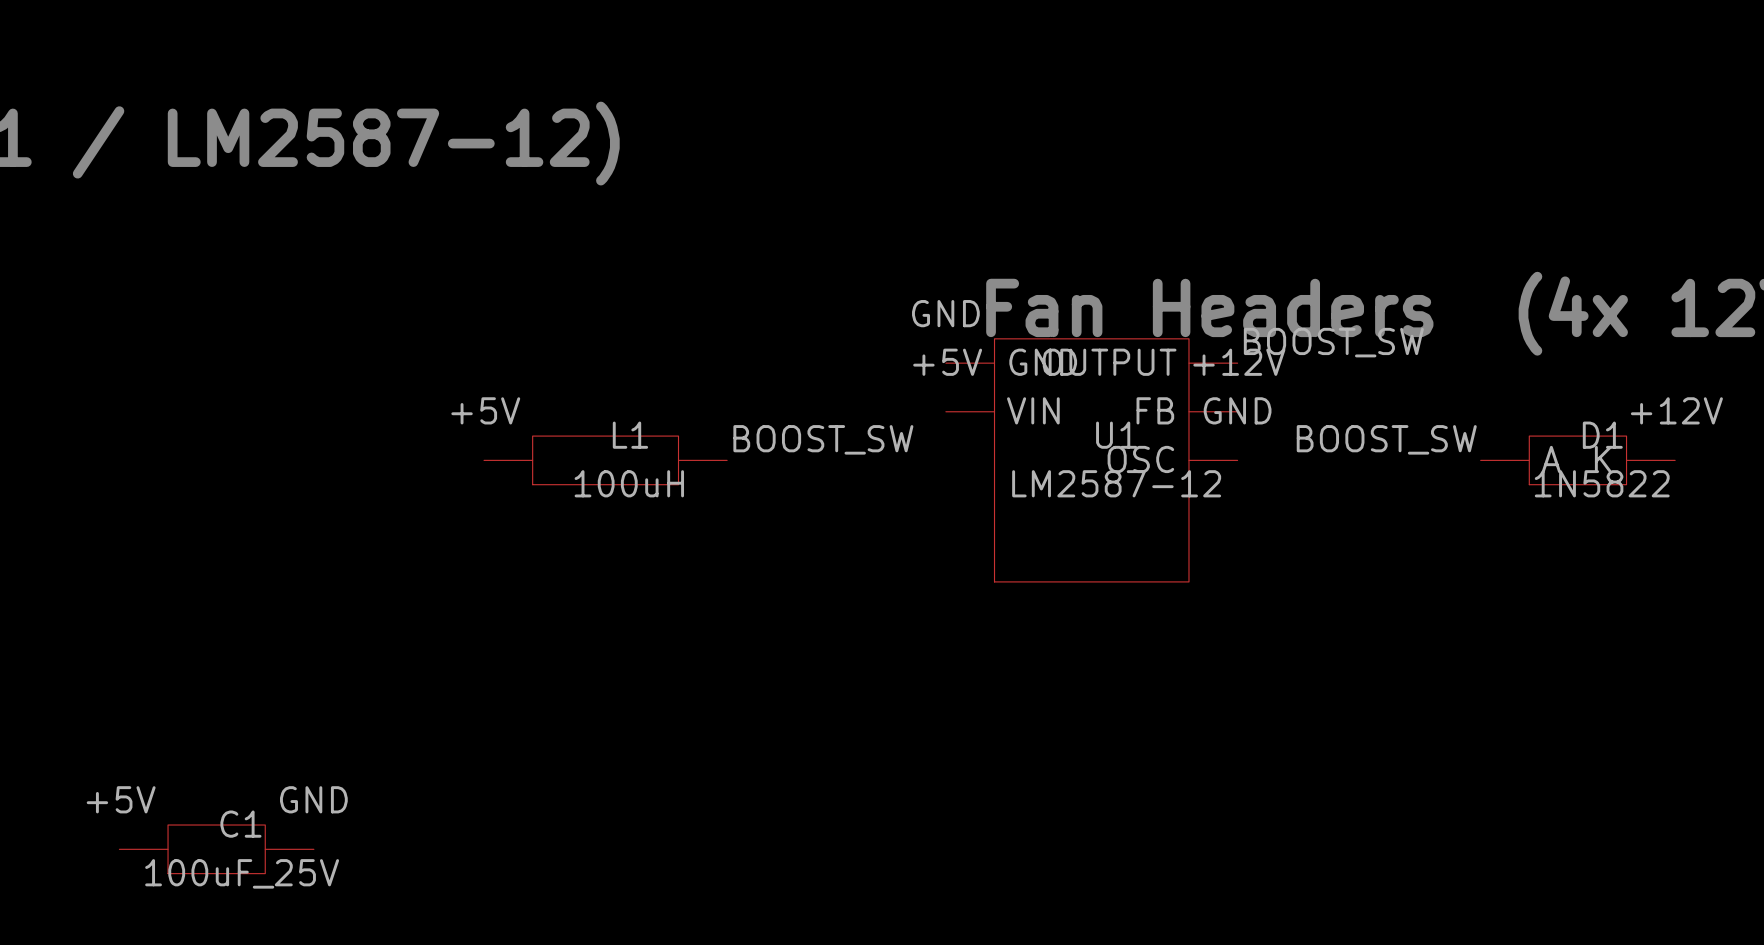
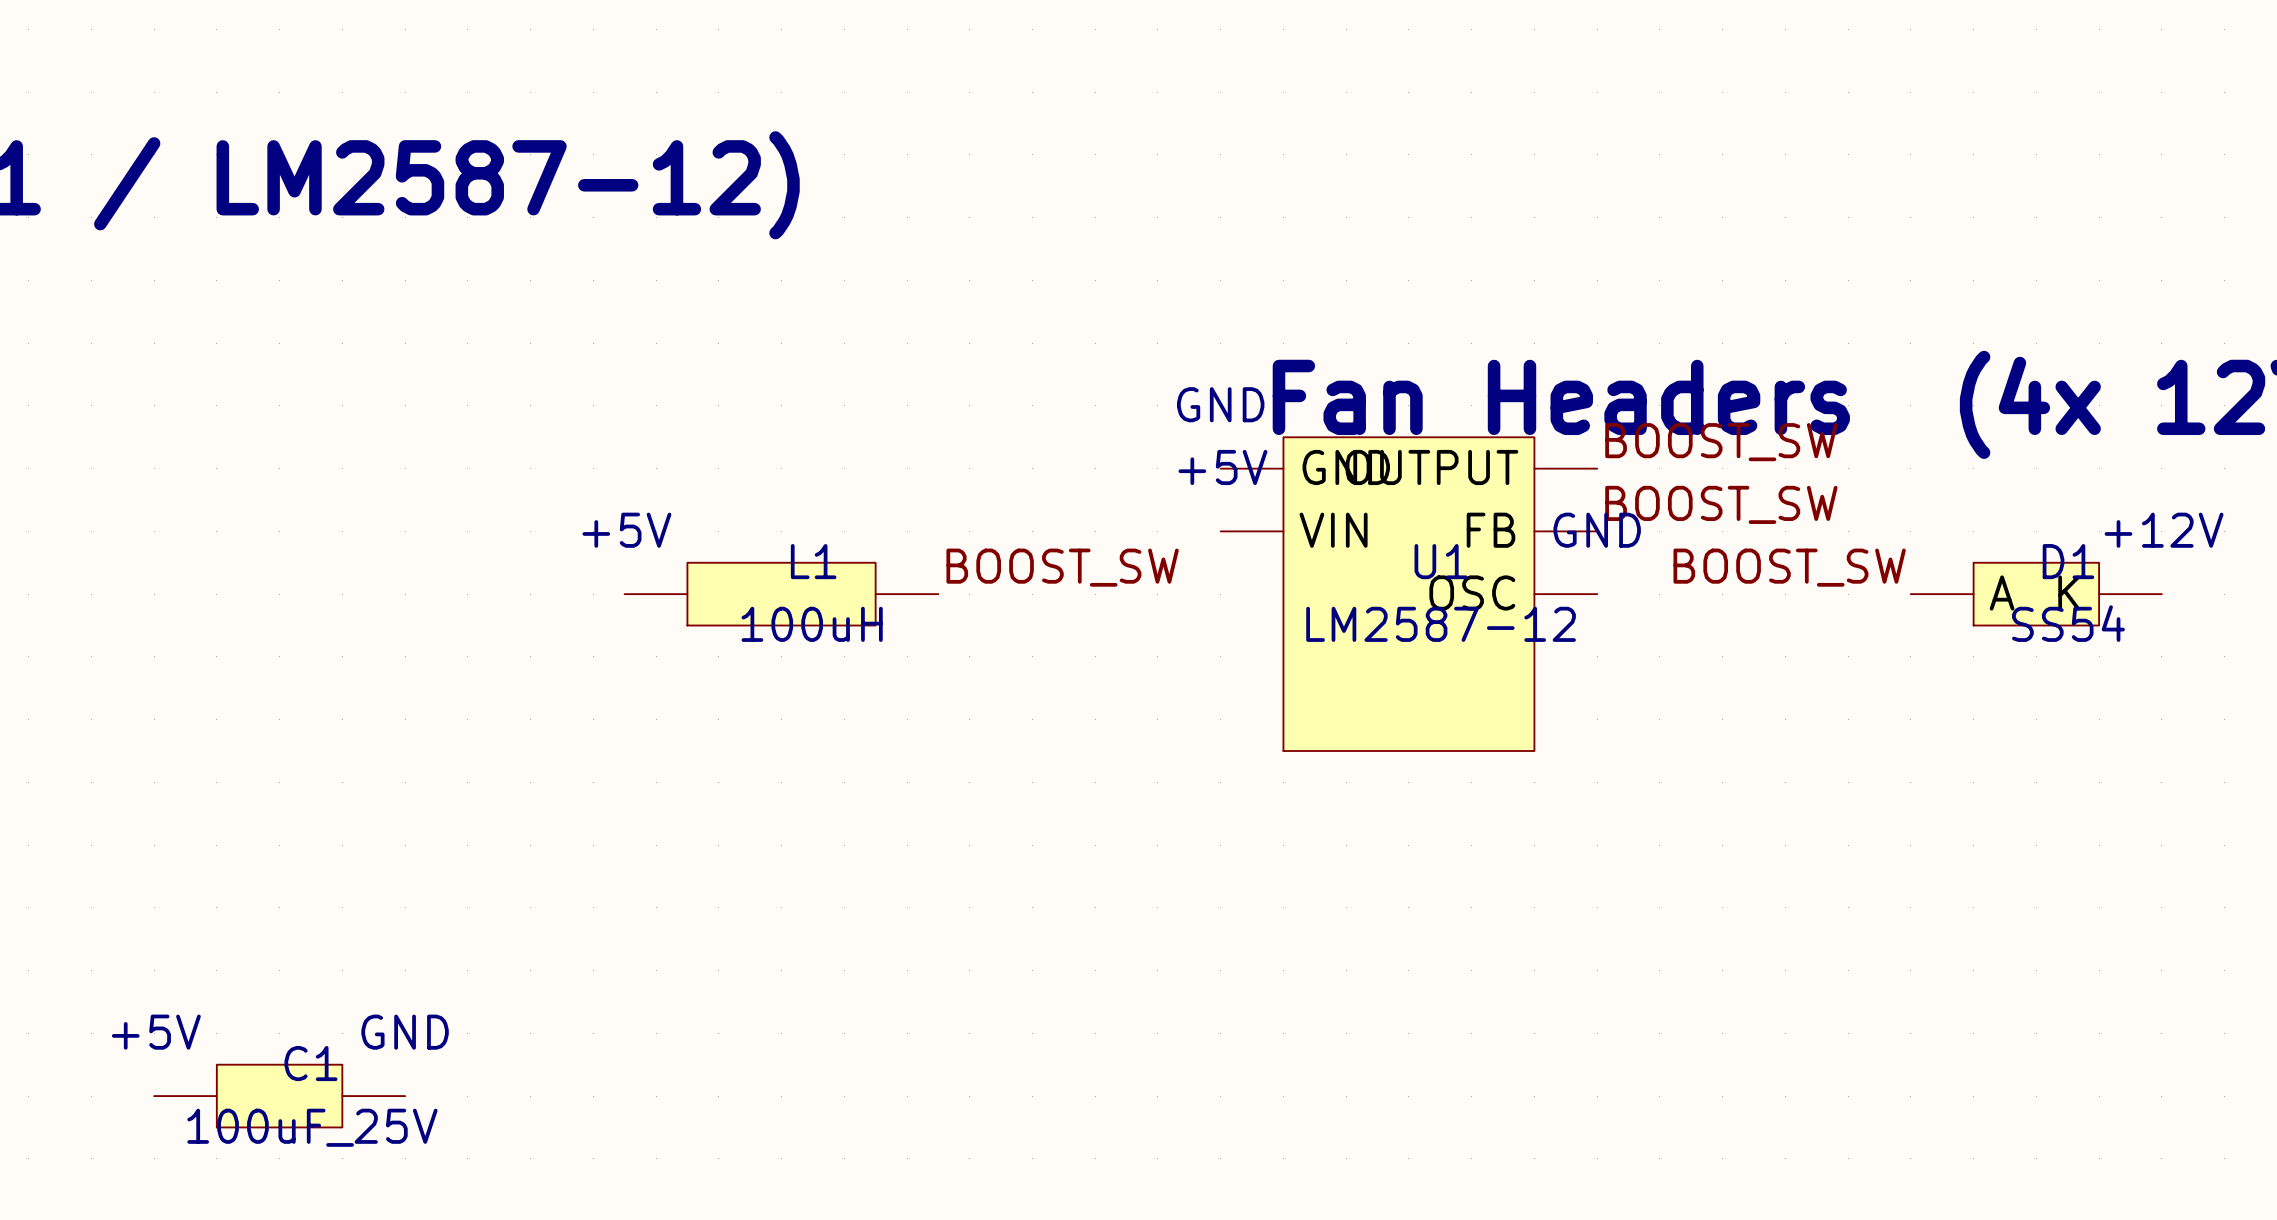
power symbol: +12V (1239, 362) -> none
label: none -> BOOST_SW (1721, 504)
D1 value: 1N5822 (1602, 483) -> SS54 (2068, 623)

